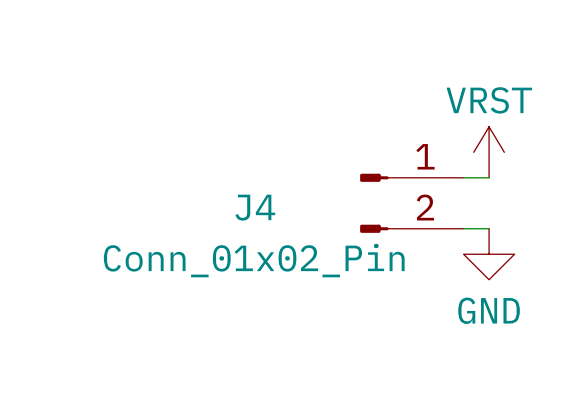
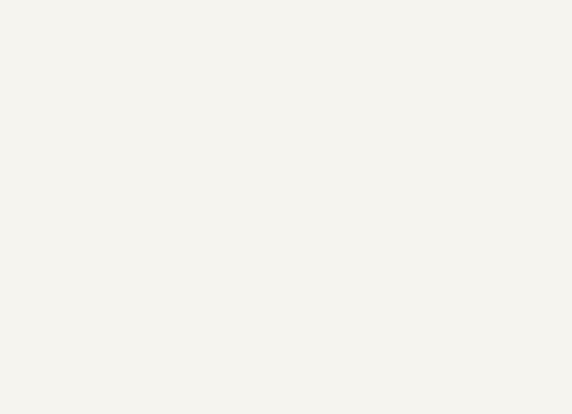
power symbol: VRST (489, 152) -> none
wire: (463, 177) (489, 177) -> none
J4: Conn_01x02_Pin (411, 203) -> none
wire: (463, 228) (489, 228) -> none
power symbol: GND (489, 254) -> none

